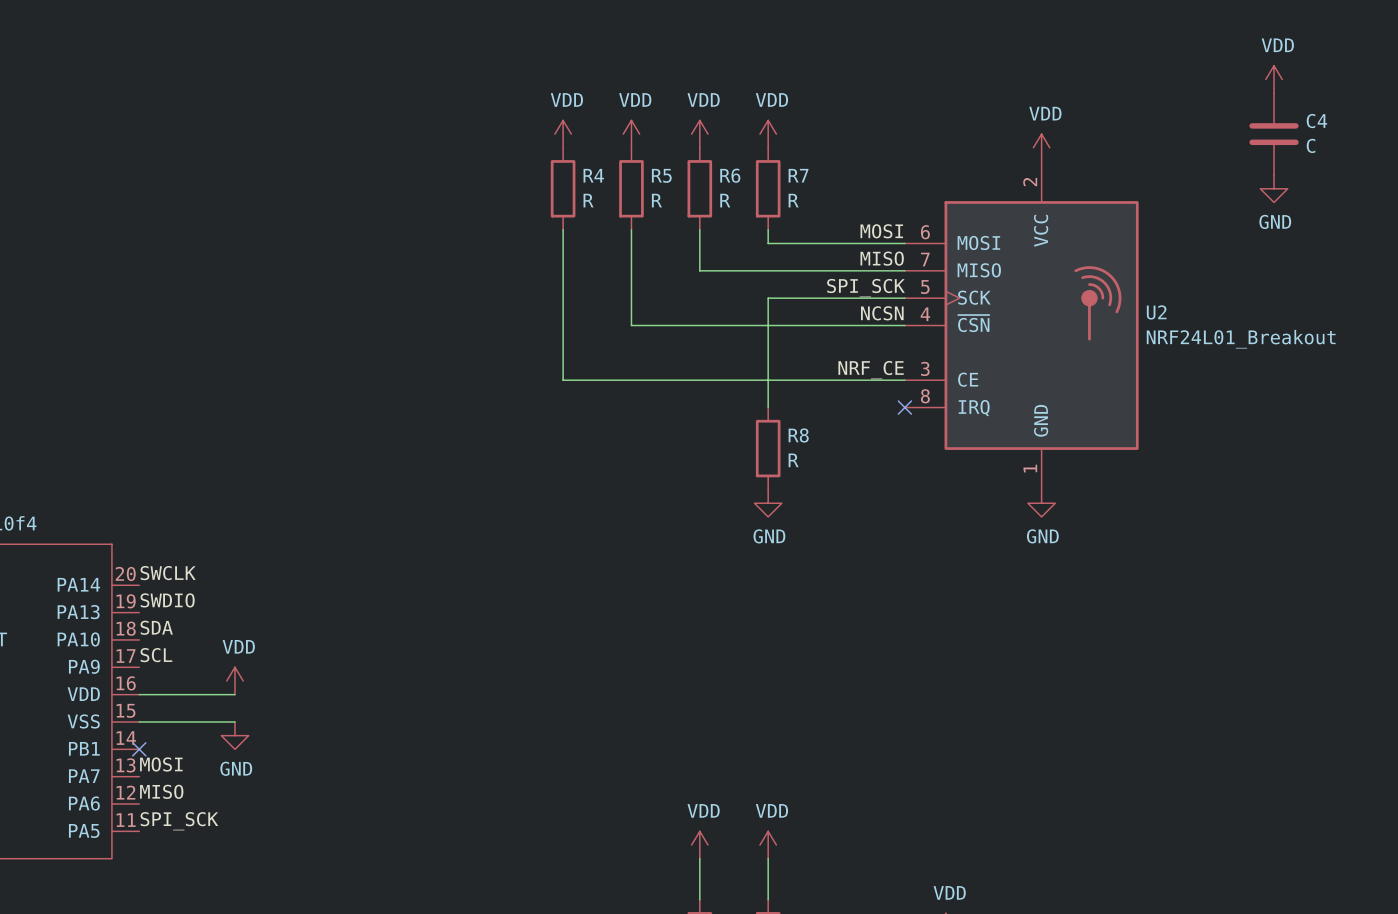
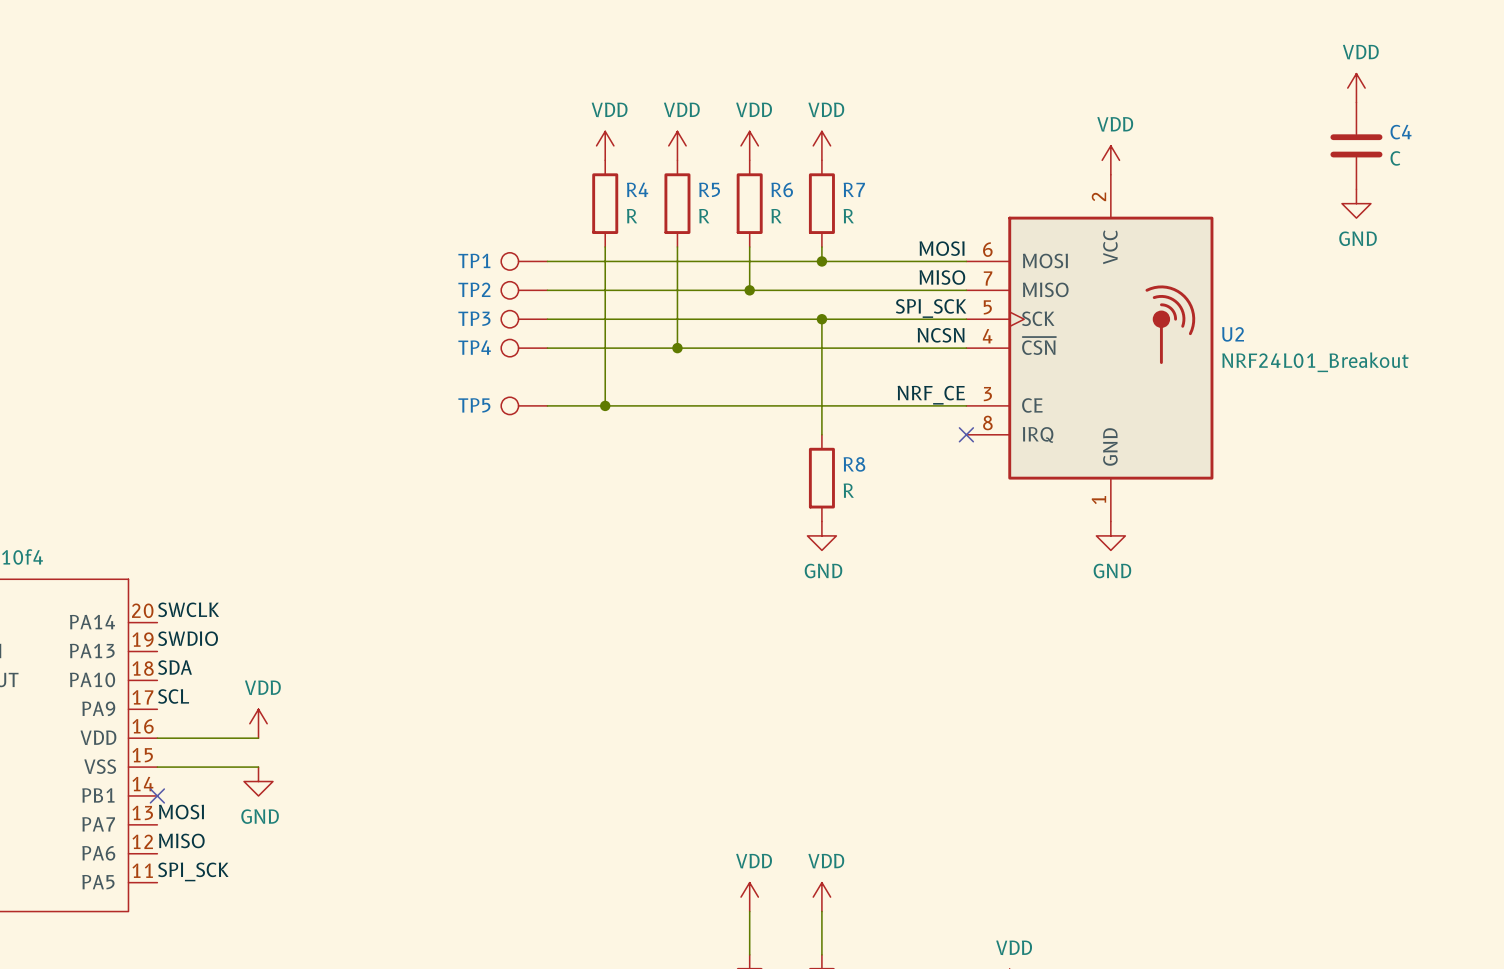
TP1: none -> (524, 261)
wire: none -> (547, 261) (821, 261)
junction: none -> (821, 261)
TP2: none -> (524, 290)
wire: none -> (547, 290) (749, 290)
junction: none -> (749, 290)
TP3: none -> (524, 319)
wire: none -> (547, 319) (821, 319)
junction: none -> (821, 319)
TP4: none -> (524, 348)
wire: none -> (547, 348) (677, 348)
junction: none -> (677, 348)
TP5: none -> (524, 405)
wire: none -> (547, 405) (605, 405)
junction: none -> (605, 405)

